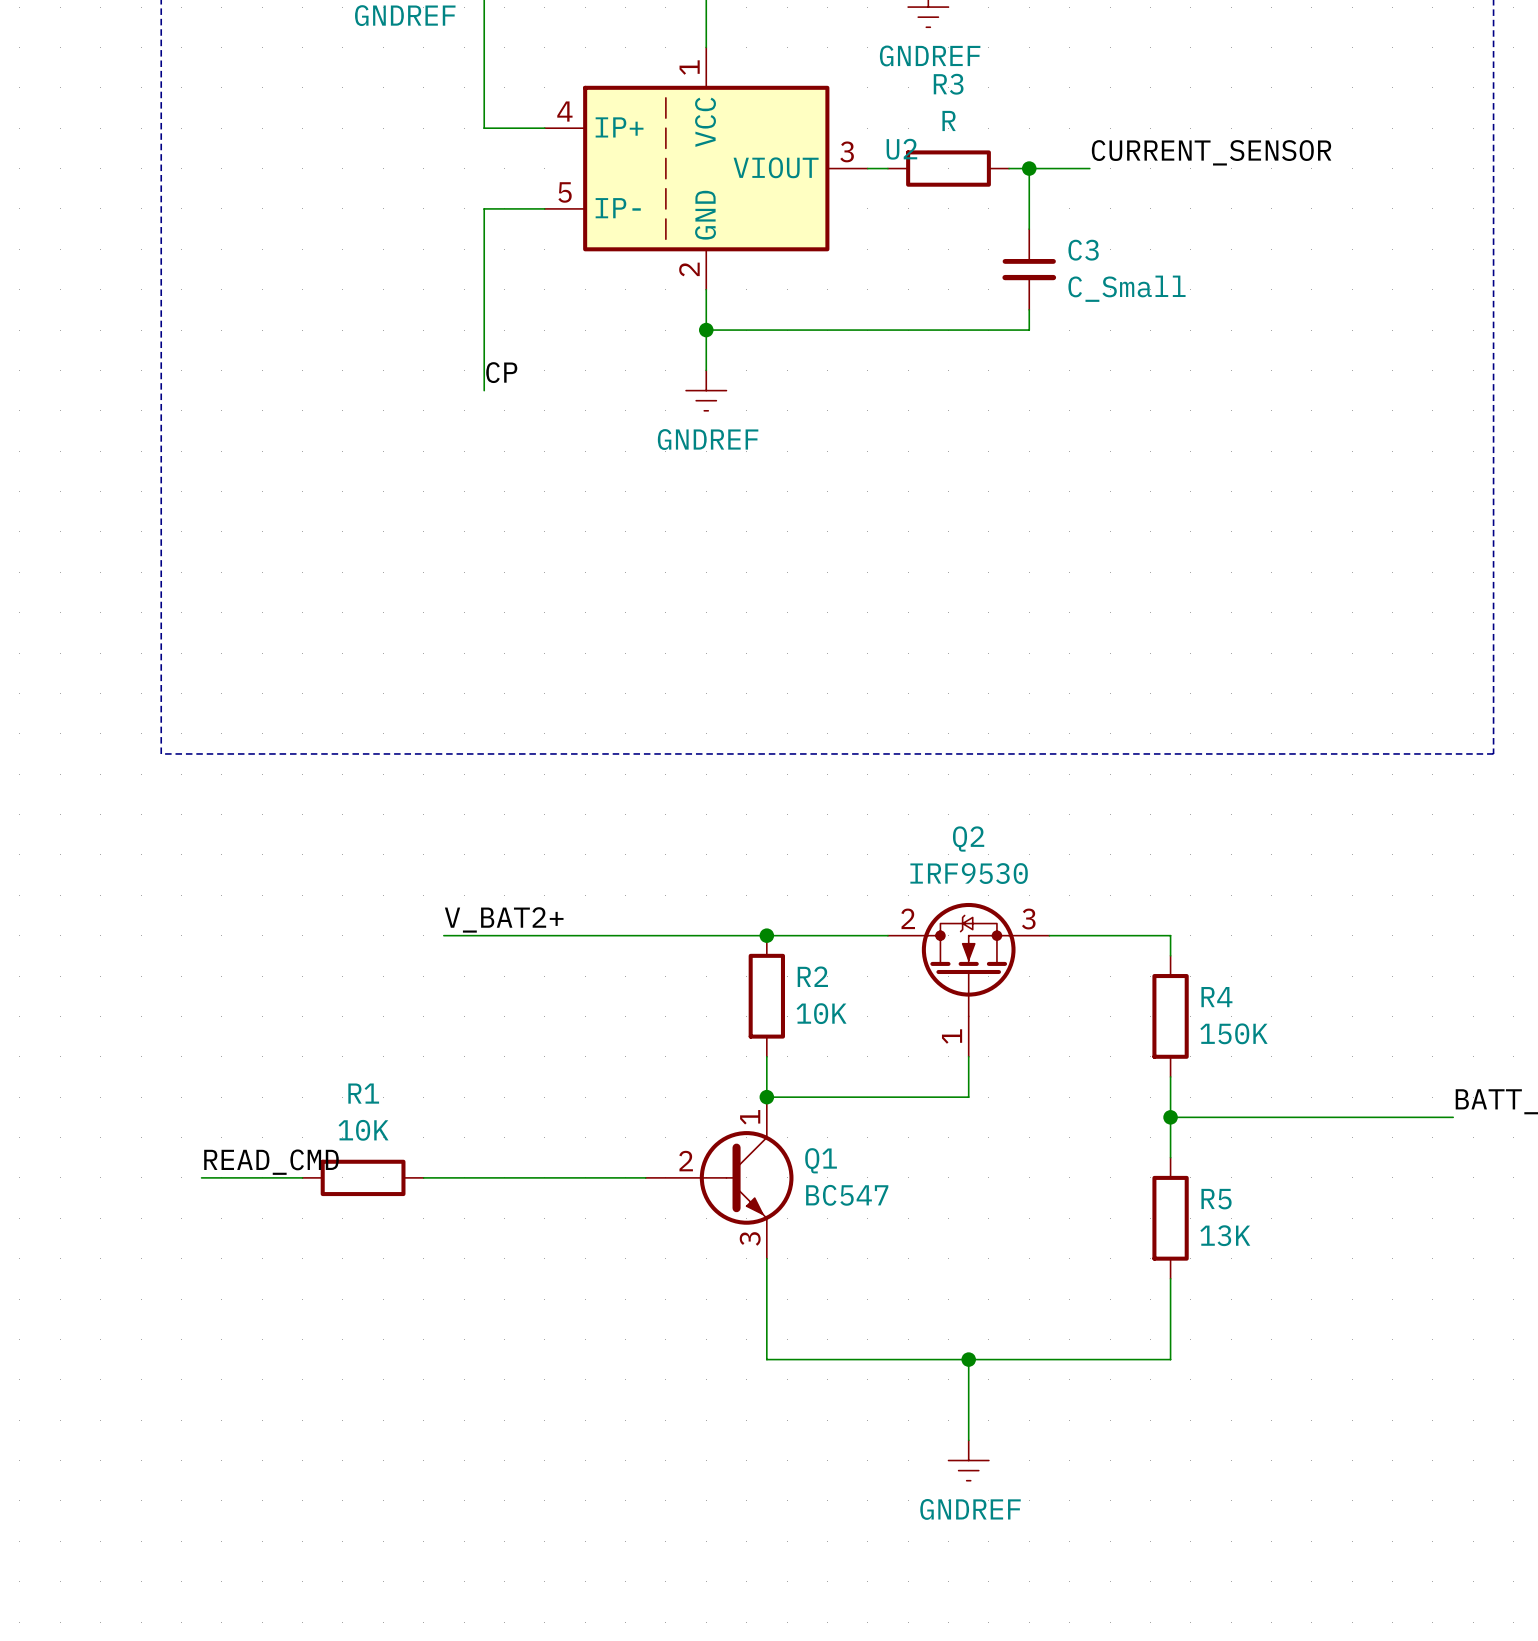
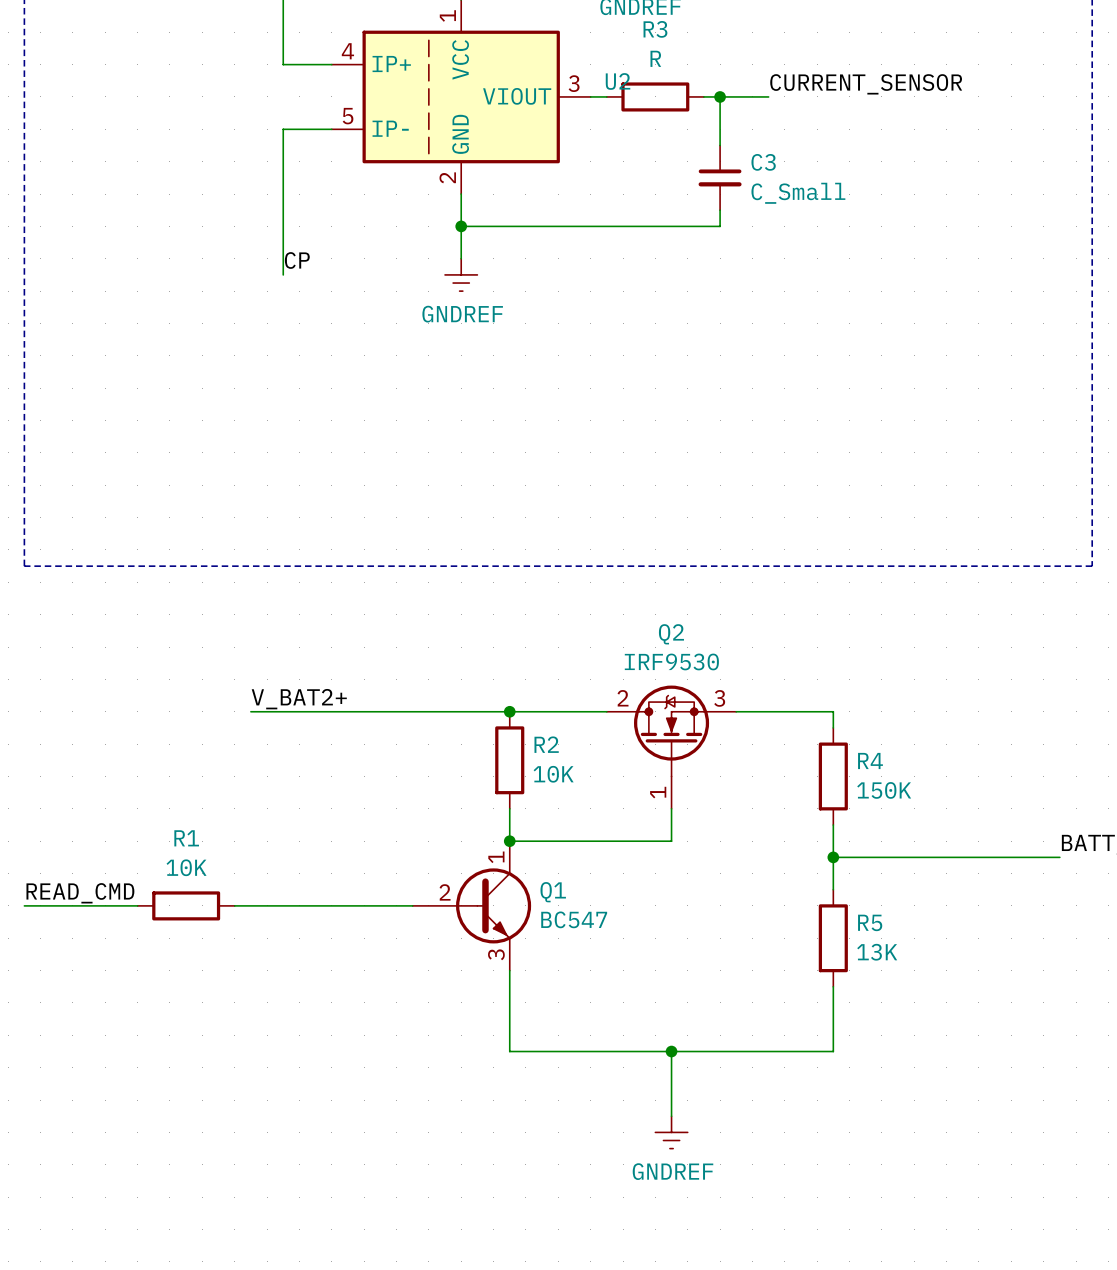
label position: READ_CMD (271, 1162) -> READ_CMD (80, 893)
wire: none -> (24, 905) (56, 905)

